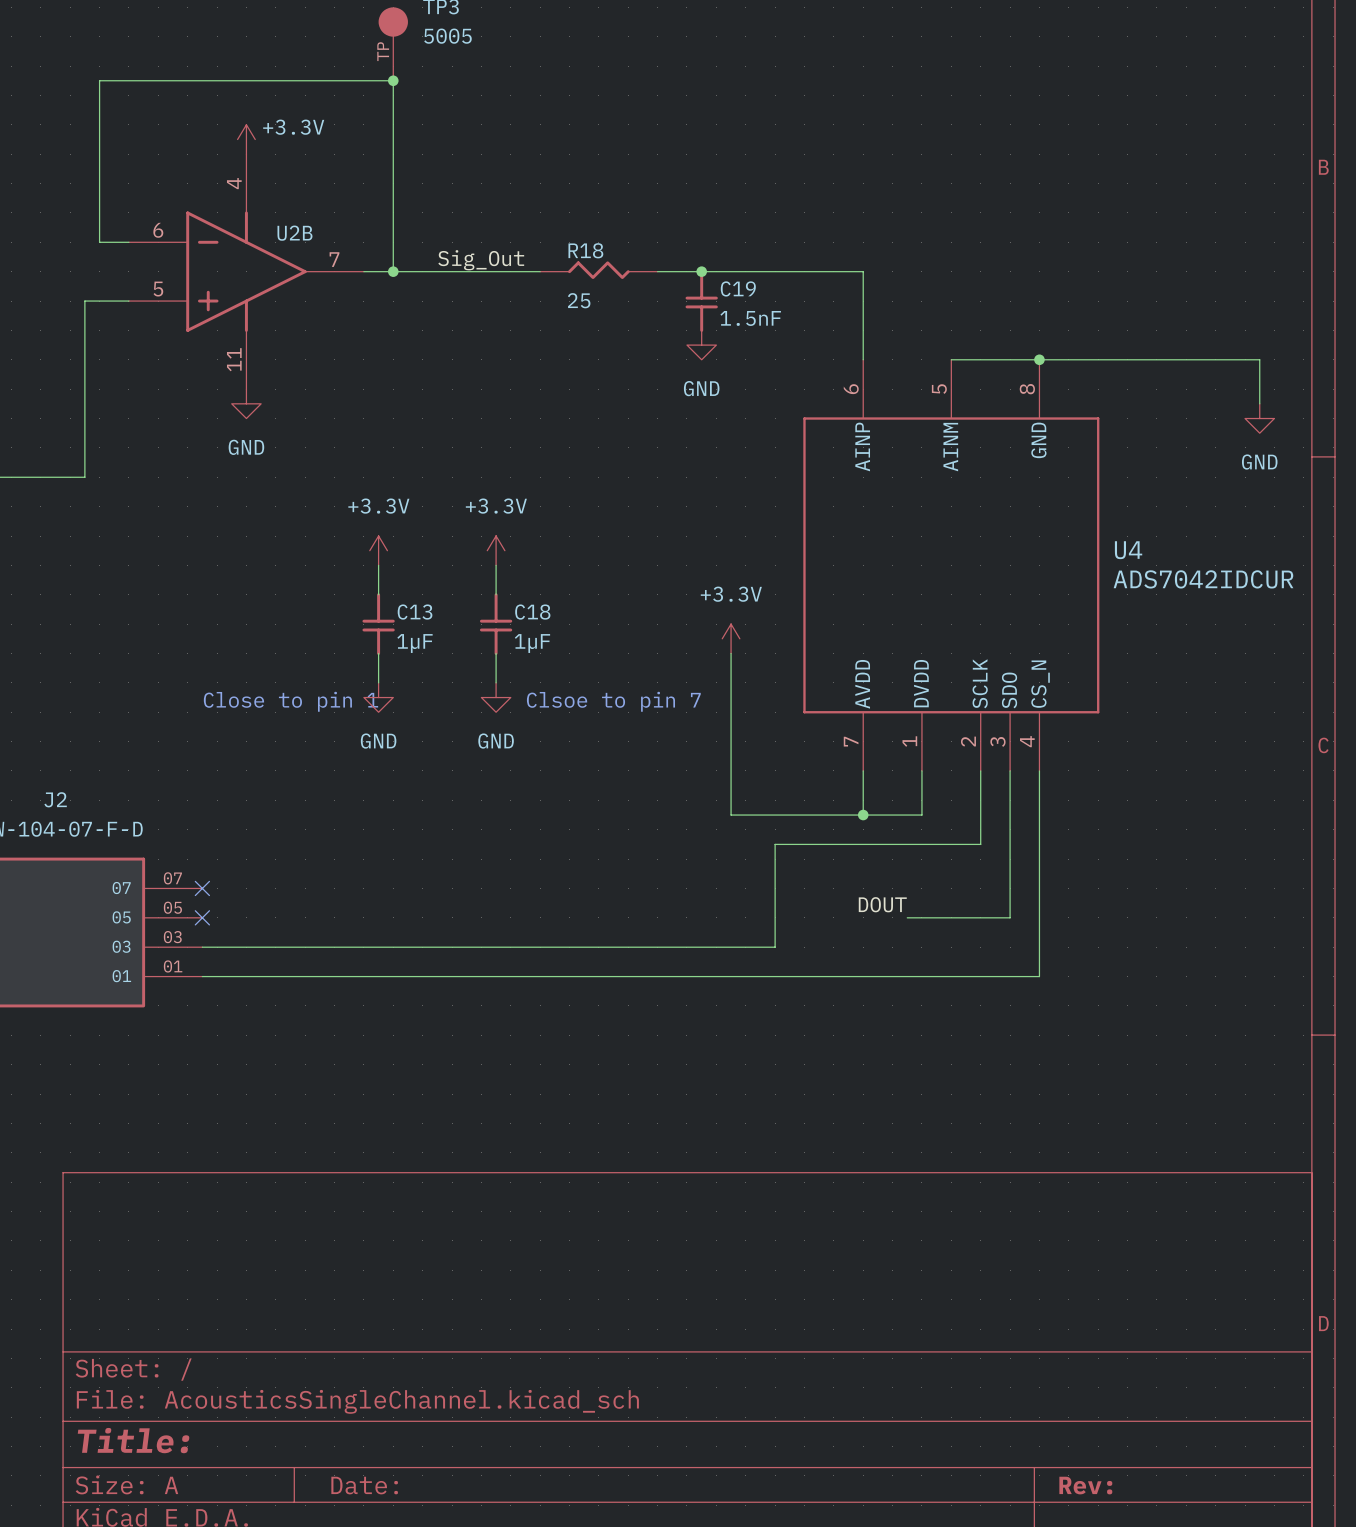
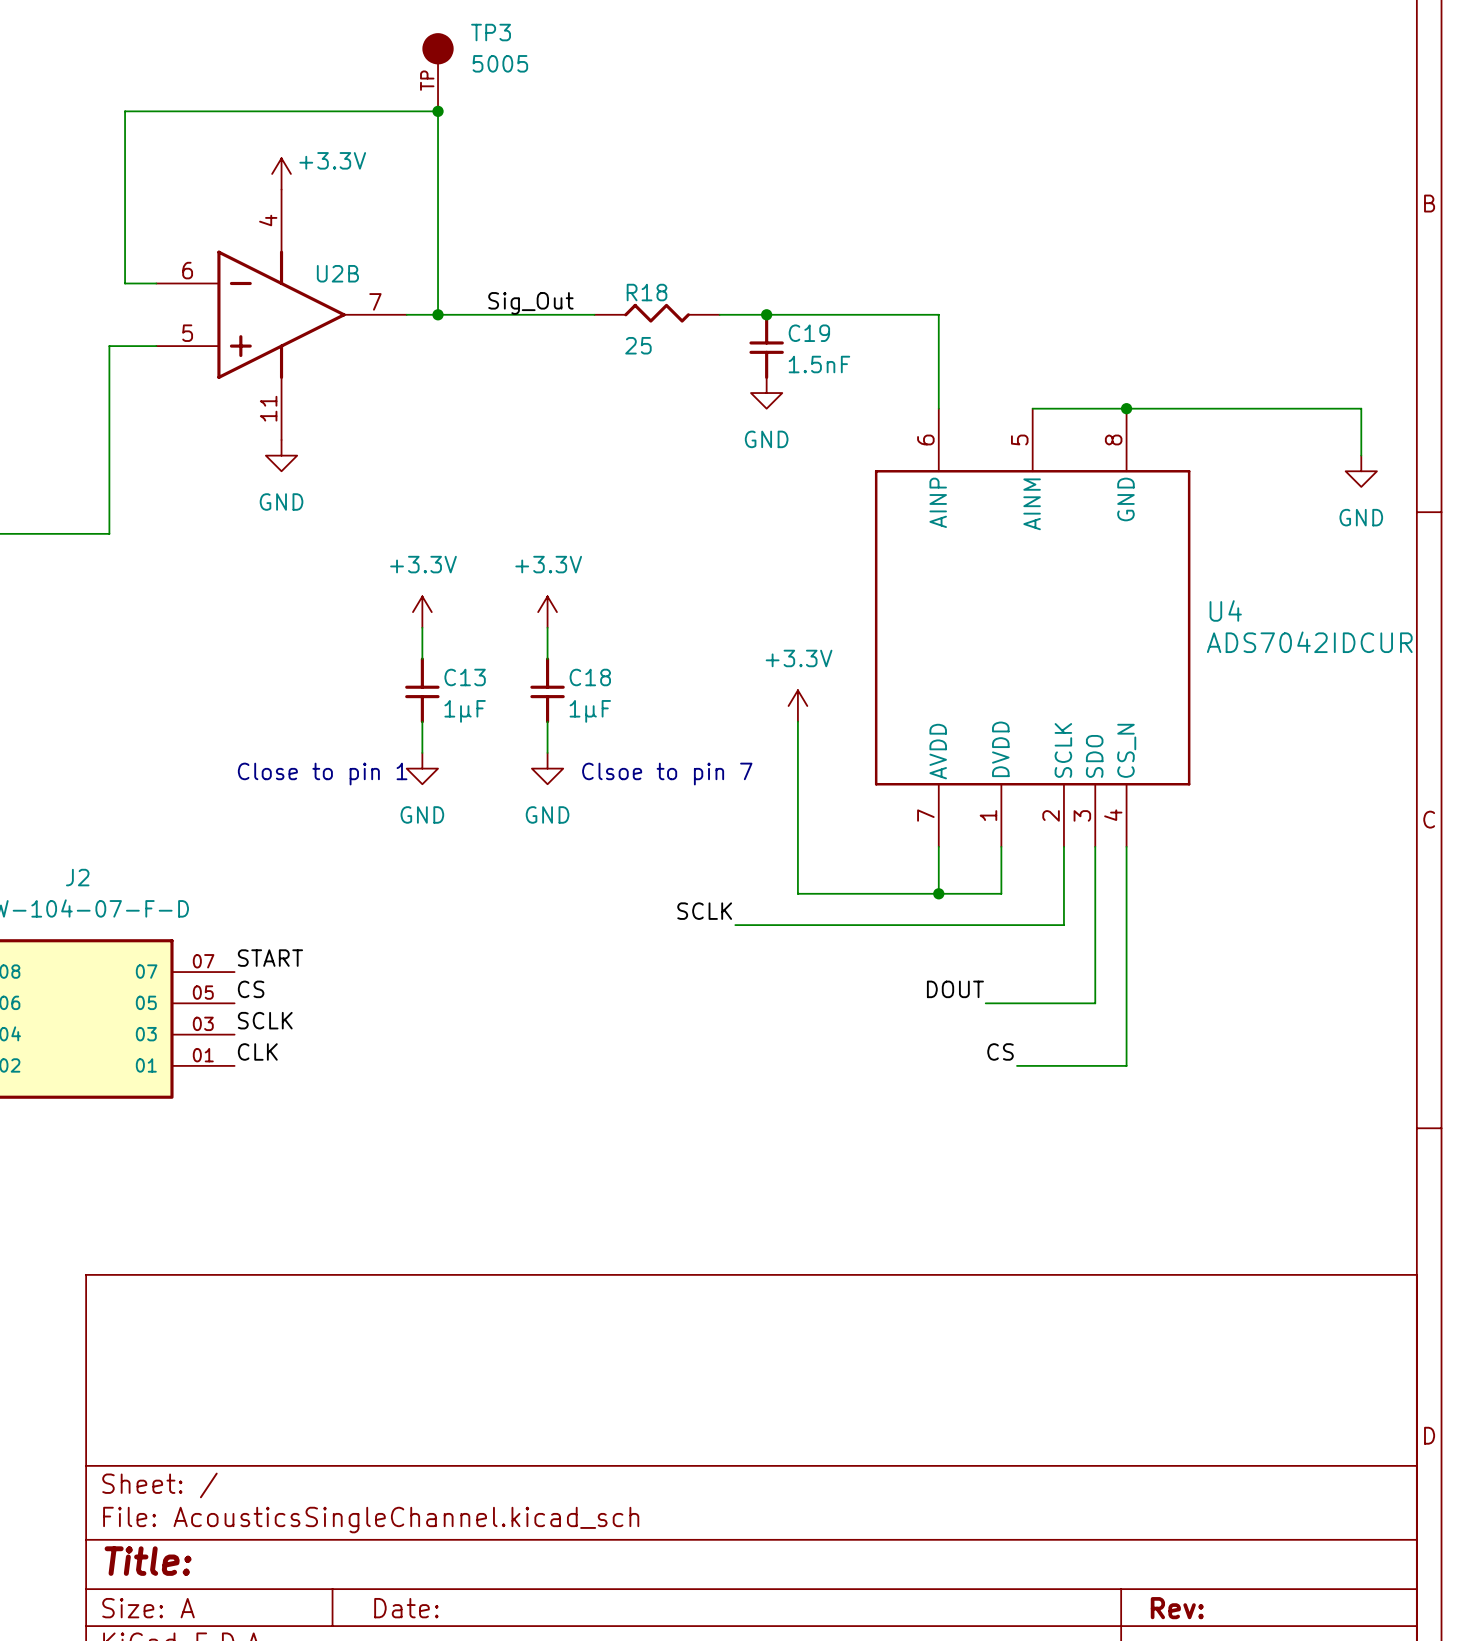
label: none -> SCLK (704, 911)
wire: (775, 844) (775, 947) (202, 947) -> (844, 925) (735, 925)
label: none -> START (270, 958)
no-connect mark: (202, 888) -> none
label: none -> CS (251, 989)
no-connect mark: (202, 917) -> none
label: none -> SCLK (265, 1020)
label: none -> CLK (257, 1051)
label: none -> CS (1000, 1051)
wire: (202, 976) (936, 976) -> none

